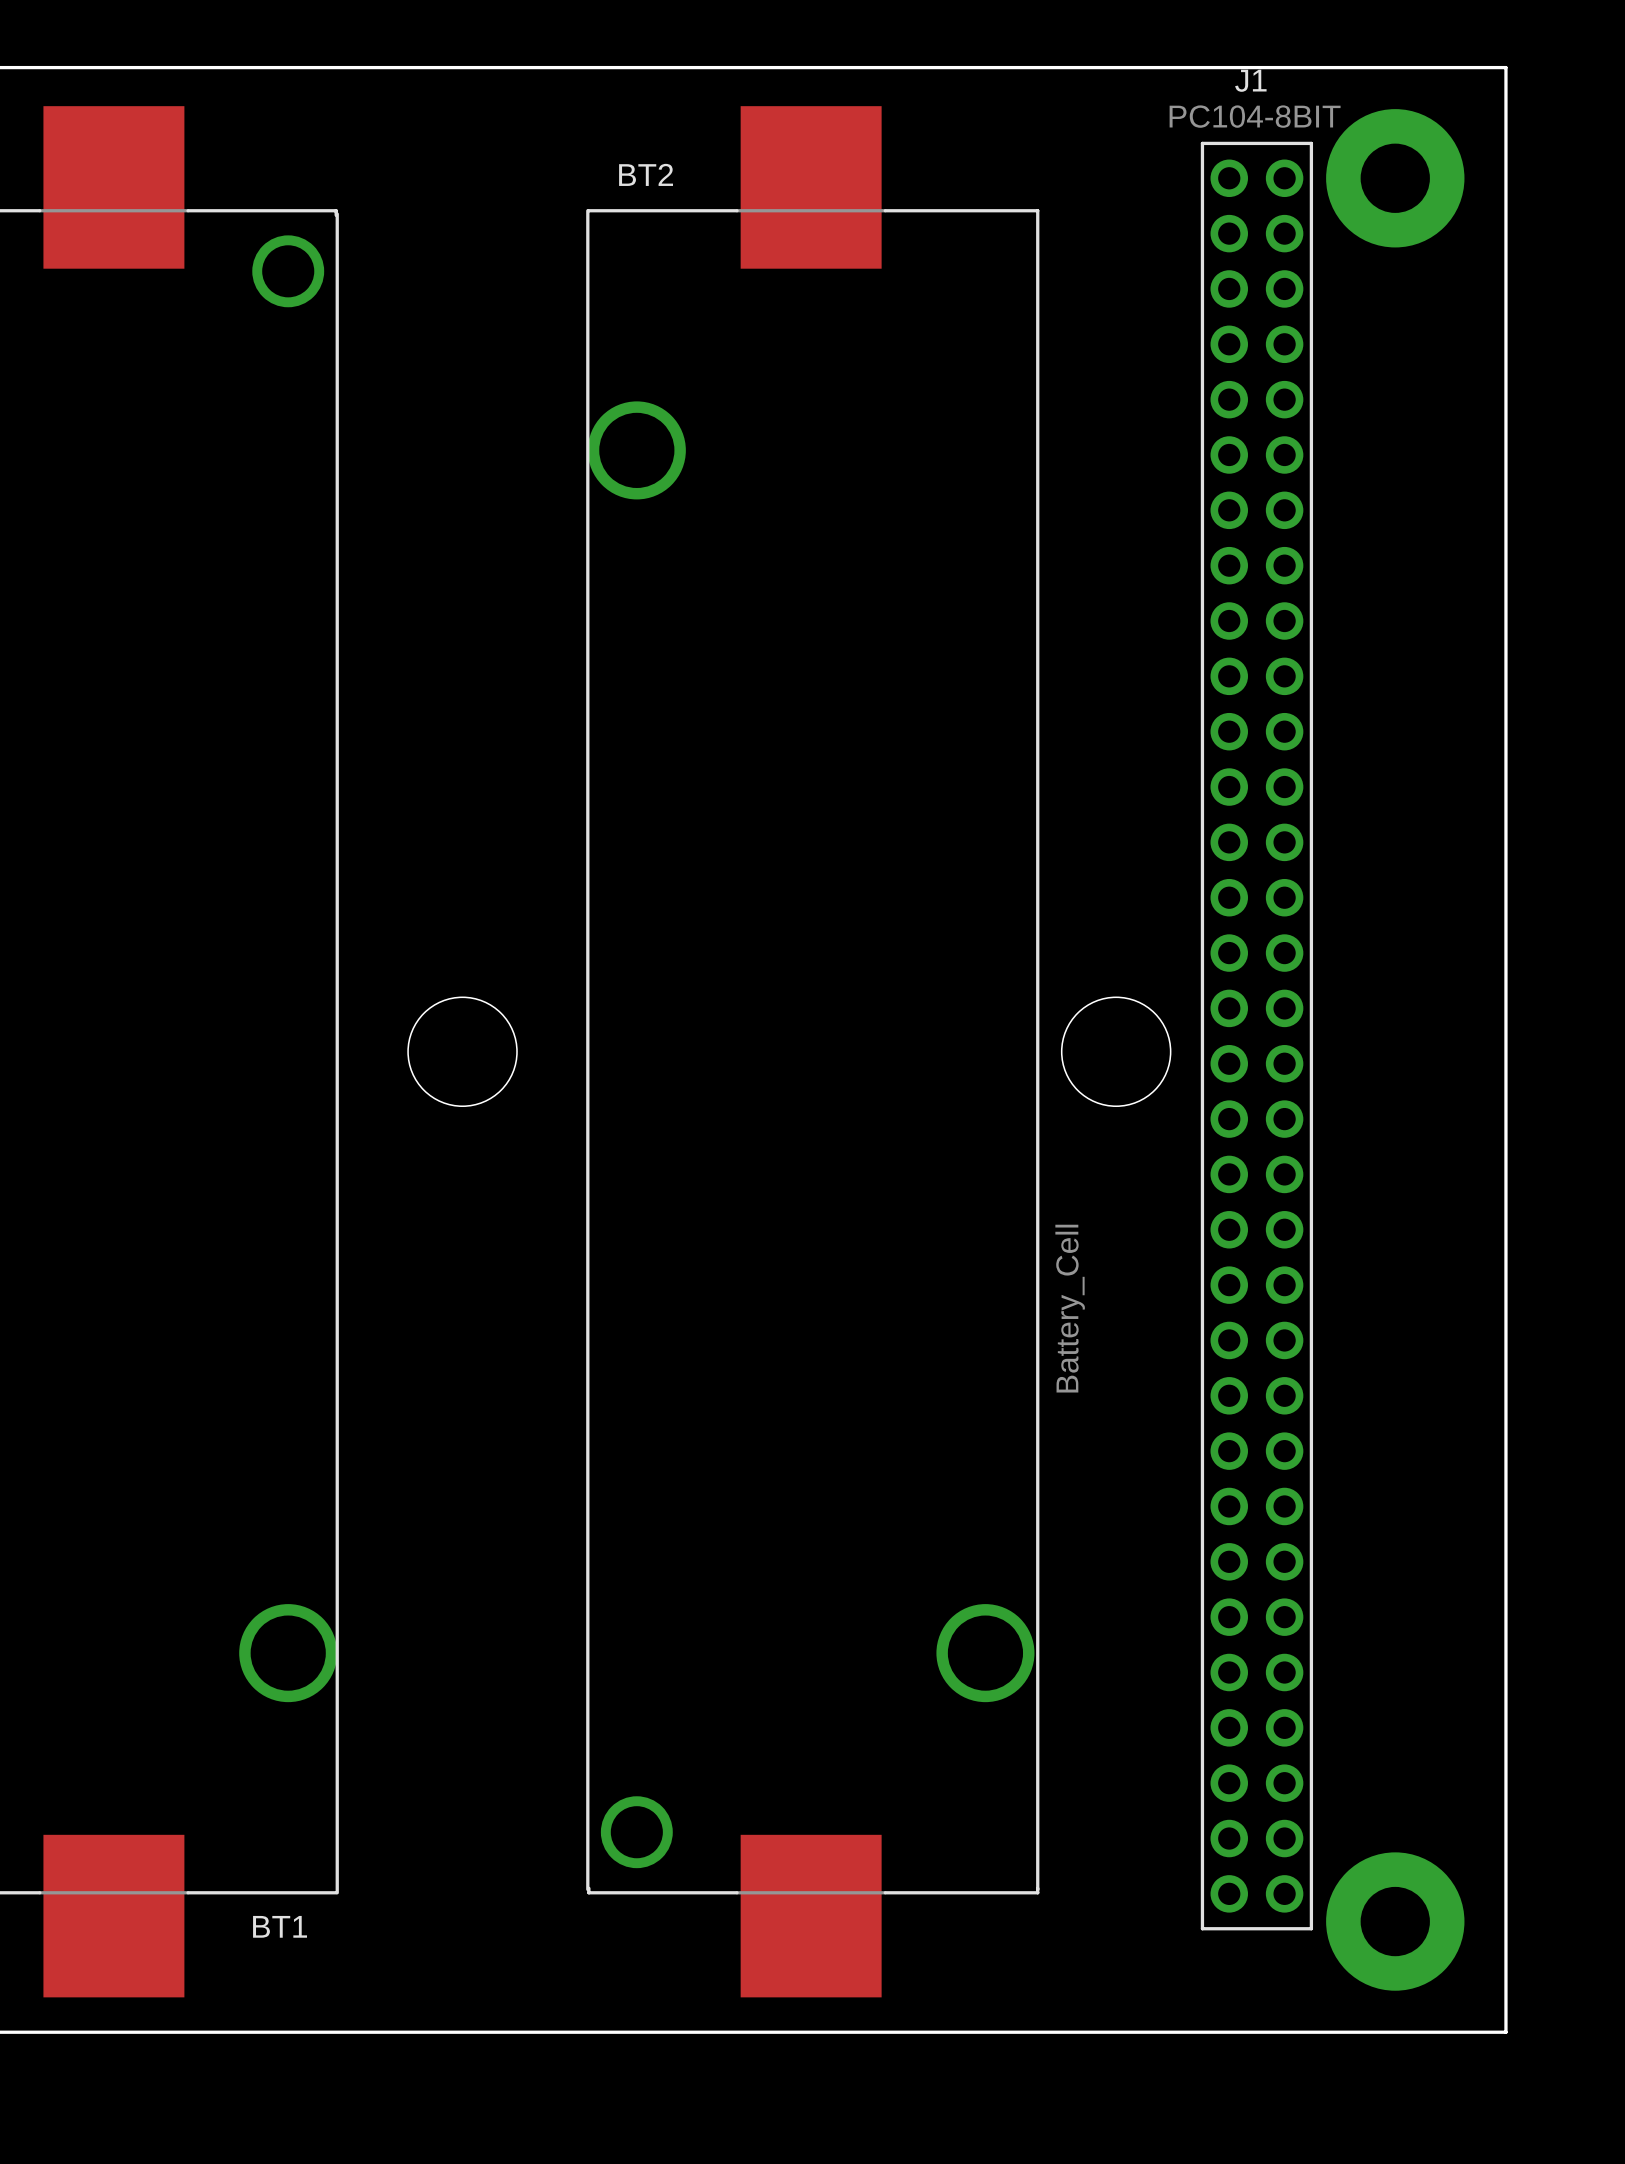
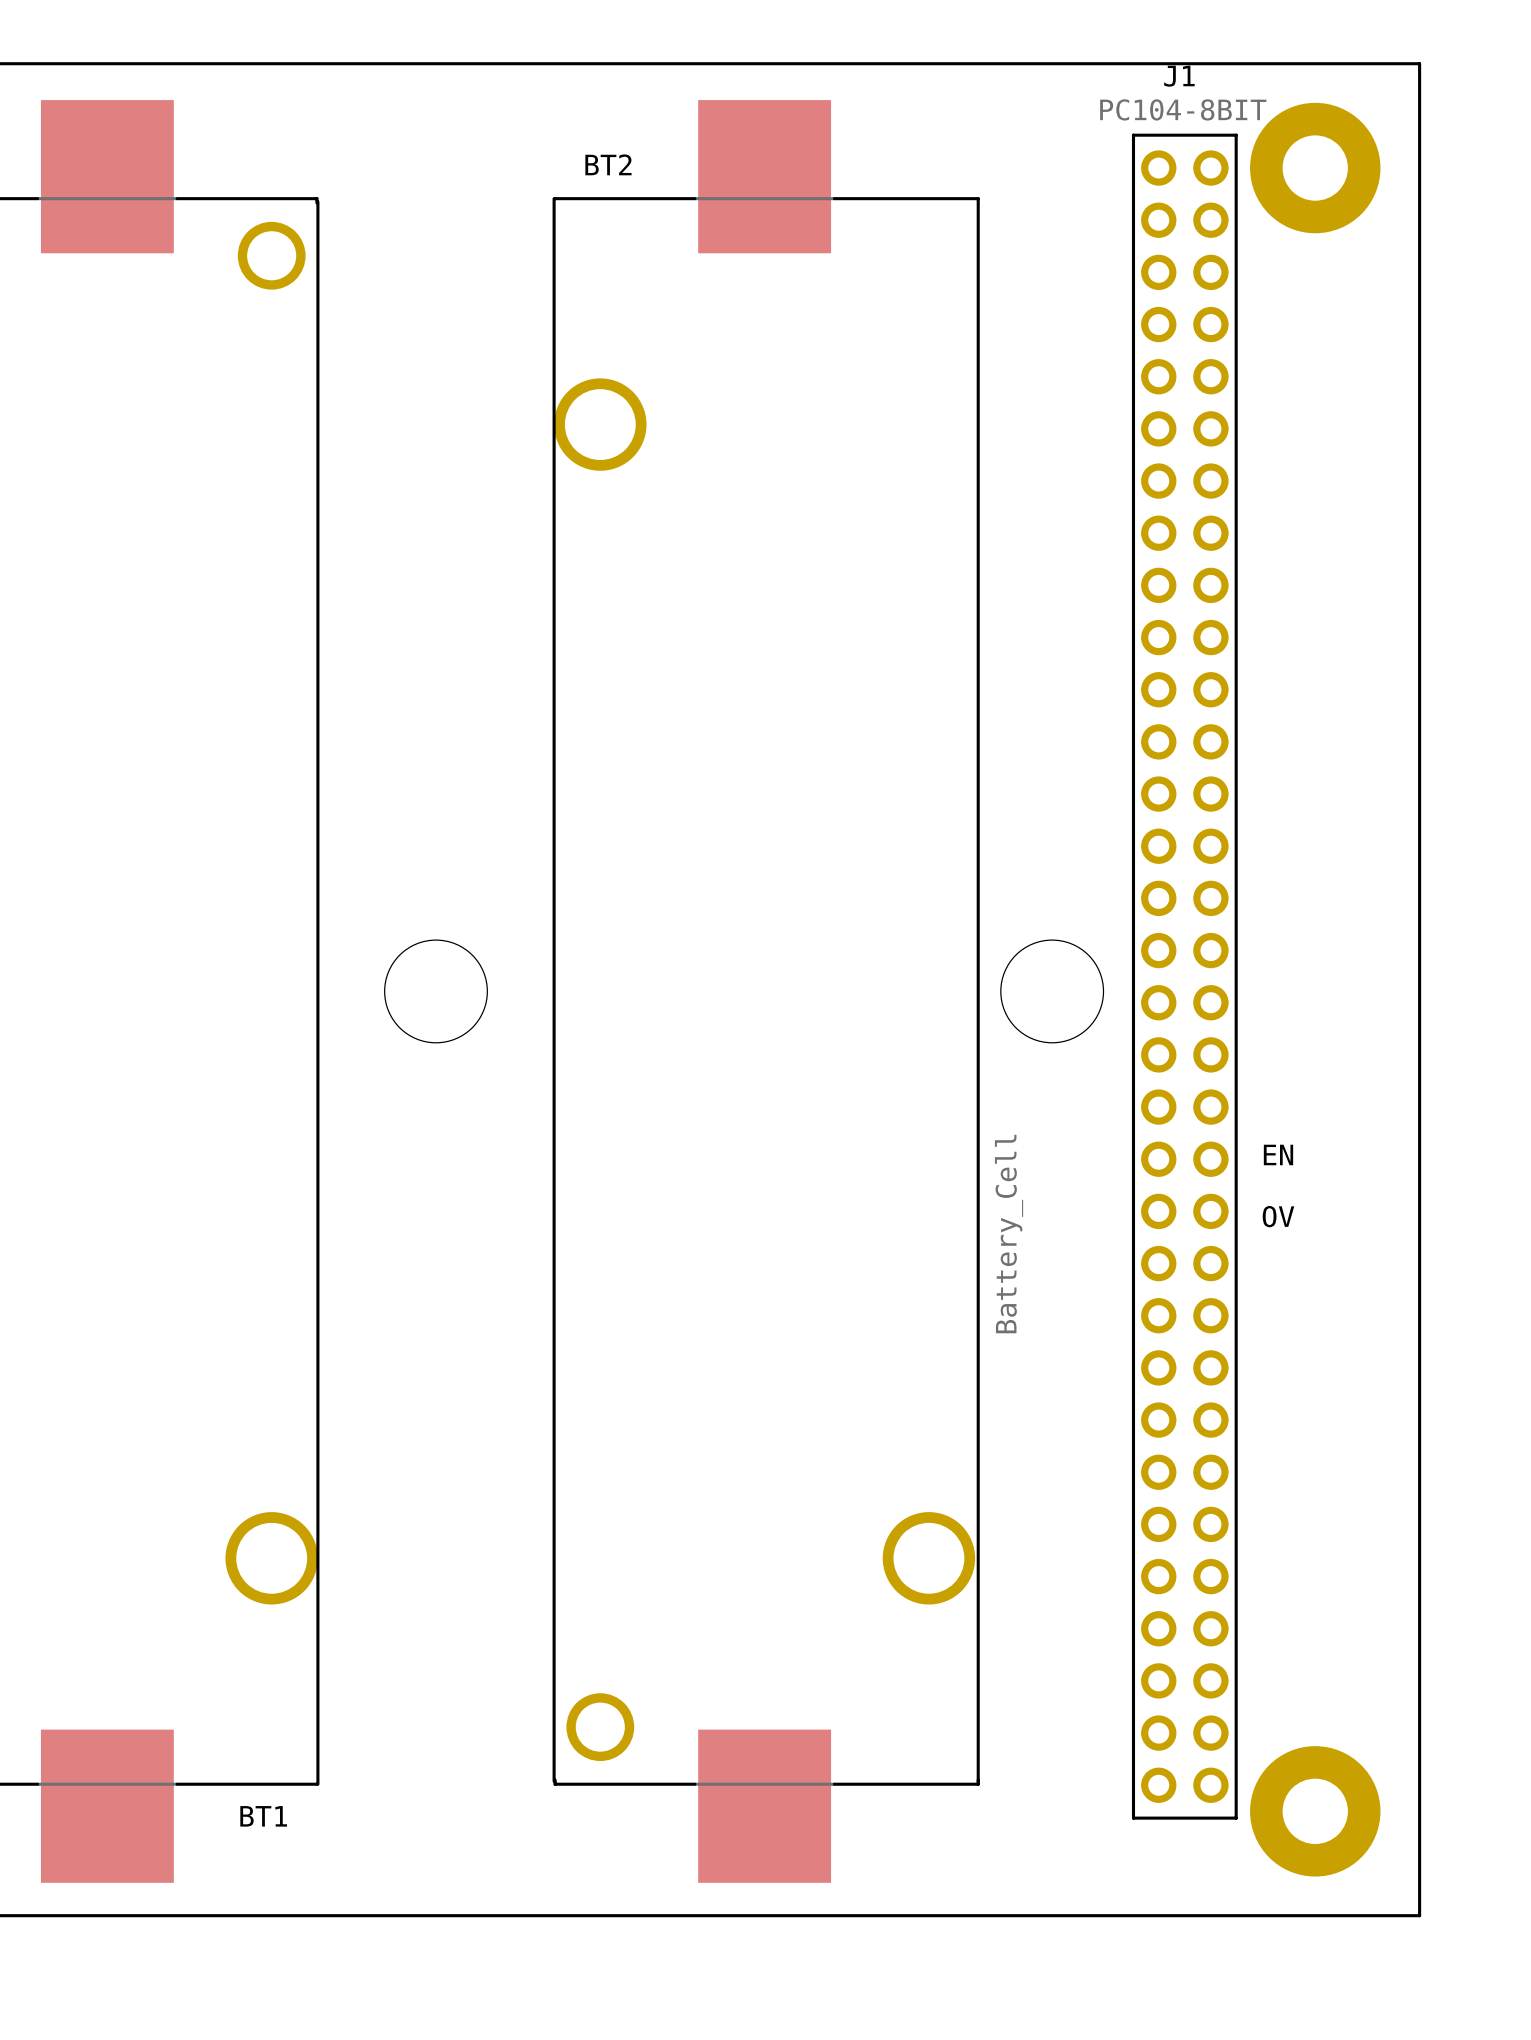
text: none -> EN (1278, 1154)
text: none -> OV (1278, 1216)

